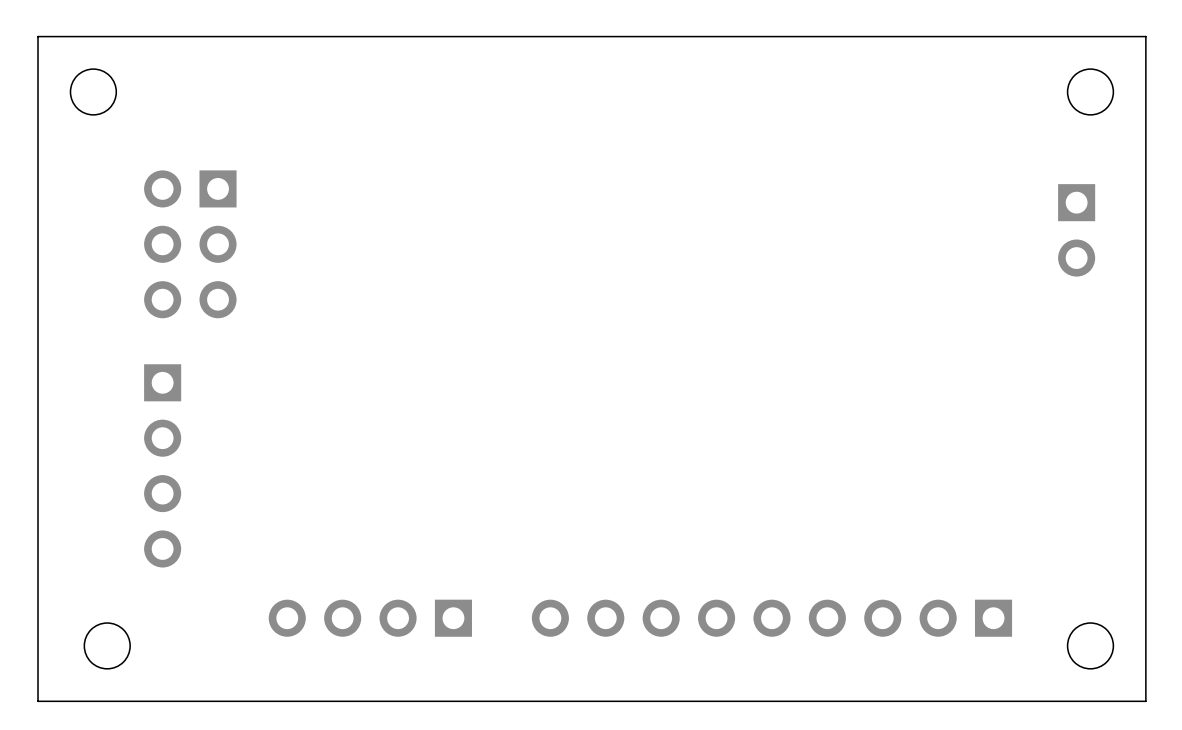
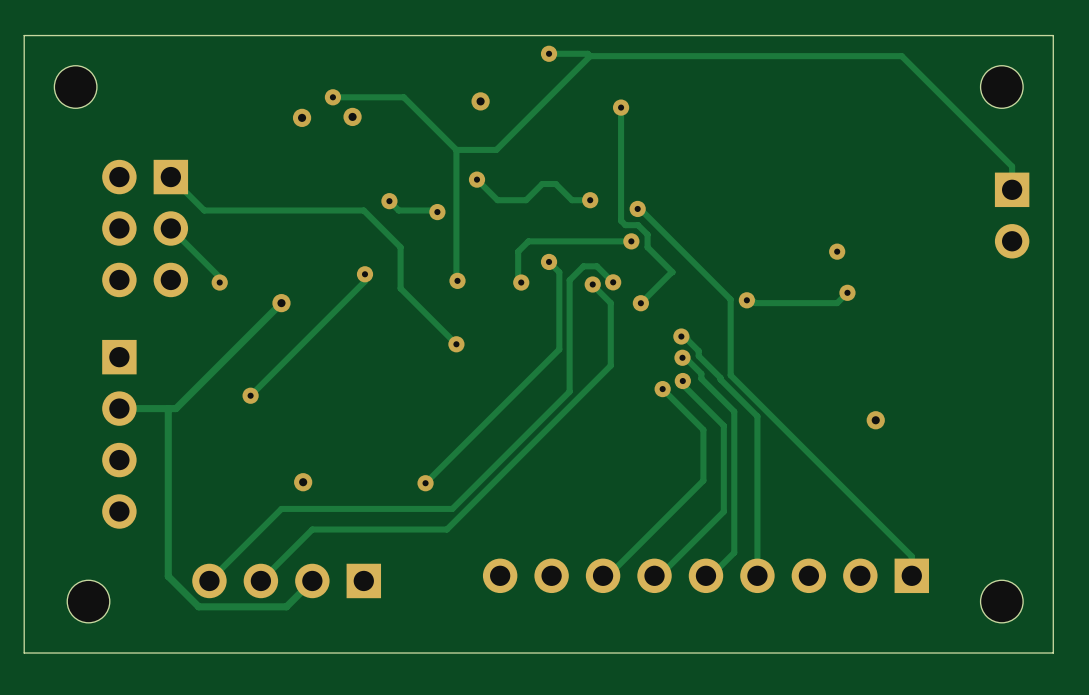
track: none -> (549, 53) (587, 53) (590, 56)
via: none -> (549, 53)
track: none -> (590, 56) (901, 56) (1012, 166) (1012, 189)
track: none -> (590, 56) (496, 149) (456, 149)
track: none -> (332, 97) (403, 97) (456, 149)
via: none -> (332, 97)
via: none -> (480, 101)
track: none -> (621, 107) (621, 220) (625, 225) (638, 225) (647, 234) (647, 247) (672, 272) (640, 303)
via: none -> (621, 107)
via: none -> (352, 116)
via: none -> (302, 117)
track: none -> (456, 149) (457, 280)
track: none -> (170, 177) (204, 210) (363, 210) (400, 247) (400, 288) (456, 344)
track: none -> (477, 179) (497, 200) (526, 200) (542, 184) (555, 184) (571, 200) (590, 200)
via: none -> (477, 179)
via: none -> (590, 200)
track: none -> (389, 201) (398, 210) (435, 210) (437, 212)
via: none -> (389, 201)
track: none -> (637, 208) (641, 210) (730, 299) (730, 375) (911, 556) (911, 580)
via: none -> (637, 208)
via: none -> (437, 212)
part position: (1076, 230) -> (1012, 215)
part position: (190, 244) -> (145, 228)
track: none -> (170, 228) (219, 277) (219, 282)
track: none -> (631, 241) (528, 241) (518, 251) (518, 282) (521, 282)
via: none -> (631, 241)
via: none -> (837, 251)
track: none -> (549, 261) (559, 272) (559, 349) (425, 483)
via: none -> (549, 261)
track: none -> (365, 274) (365, 281) (250, 395)
via: none -> (365, 274)
via: none -> (457, 280)
via: none -> (219, 282)
via: none -> (521, 282)
track: none -> (612, 282) (596, 266) (583, 266) (569, 280) (569, 391) (452, 508) (281, 508) (209, 580)
via: none -> (613, 282)
track: none -> (592, 284) (610, 303) (610, 365) (446, 529) (312, 529) (260, 580)
via: none -> (592, 284)
track: none -> (847, 292) (837, 303) (755, 303) (746, 300)
via: none -> (847, 292)
via: none -> (746, 300)
track: none -> (281, 303) (175, 408) (119, 408) (127, 416)
via: none -> (281, 303)
via: none -> (640, 303)
via: none -> (681, 336)
track: none -> (689, 341) (698, 351) (698, 356) (757, 416) (757, 580)
via: none -> (456, 344)
track: none -> (682, 357) (687, 360) (701, 373) (701, 378) (734, 411) (734, 552) (705, 580)
via: none -> (682, 357)
track: none -> (682, 381) (683, 385) (723, 425) (723, 511) (654, 580)
via: none -> (682, 381)
track: none -> (662, 389) (703, 429) (703, 480) (603, 580)
via: none -> (662, 389)
via: none -> (250, 395)
track: none -> (168, 408) (168, 576) (198, 606) (286, 606) (312, 580)
via: none -> (875, 420)
part position: (162, 465) -> (119, 434)
via: none -> (303, 482)
via: none -> (425, 483)
part position: (370, 618) -> (286, 580)

